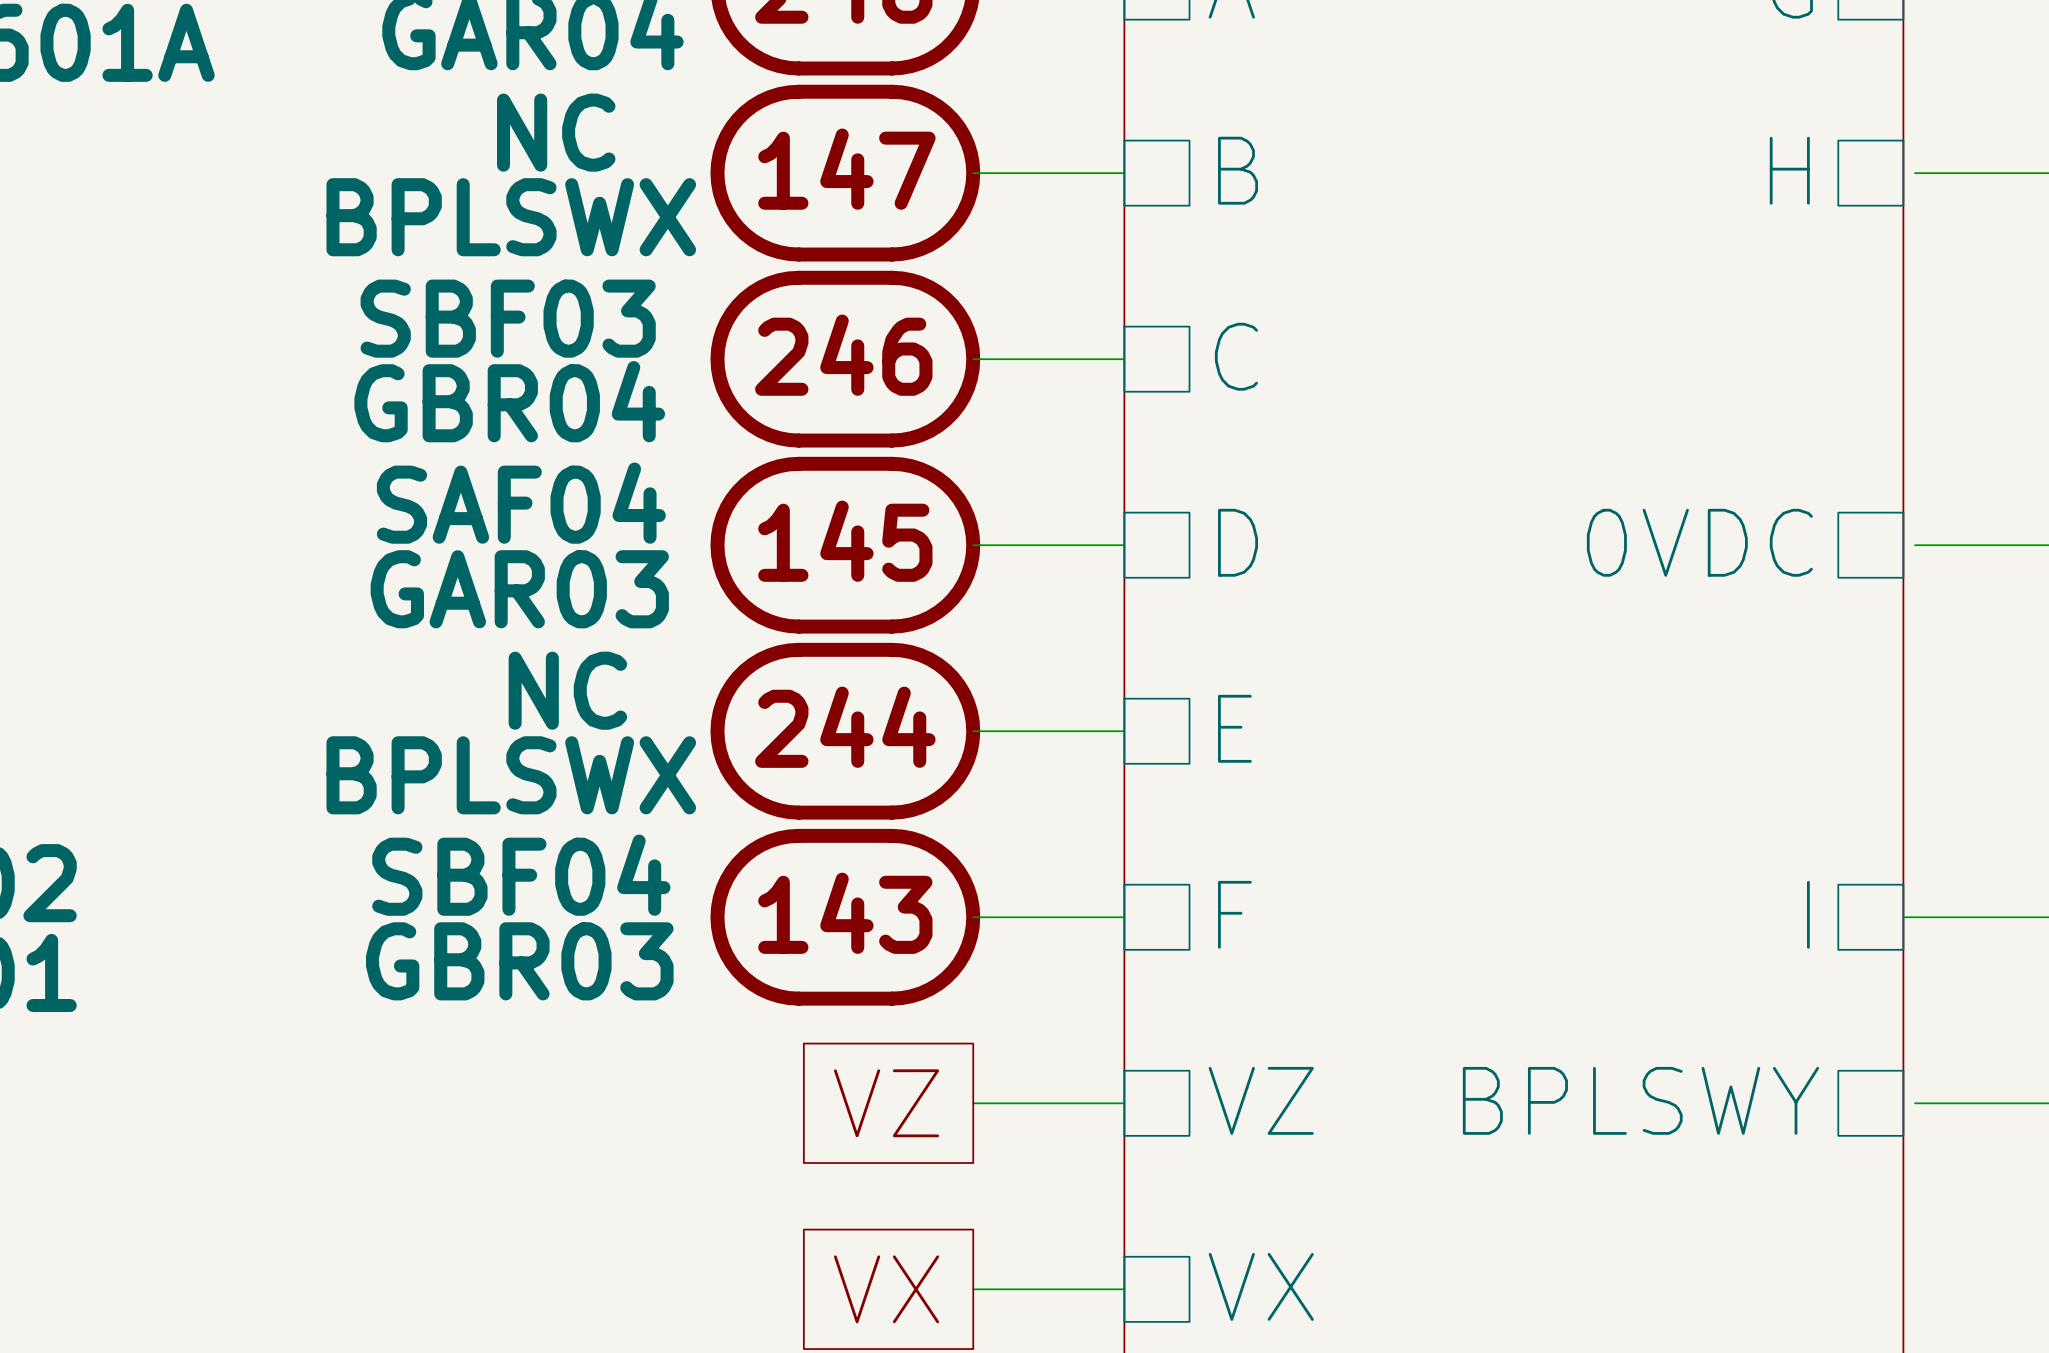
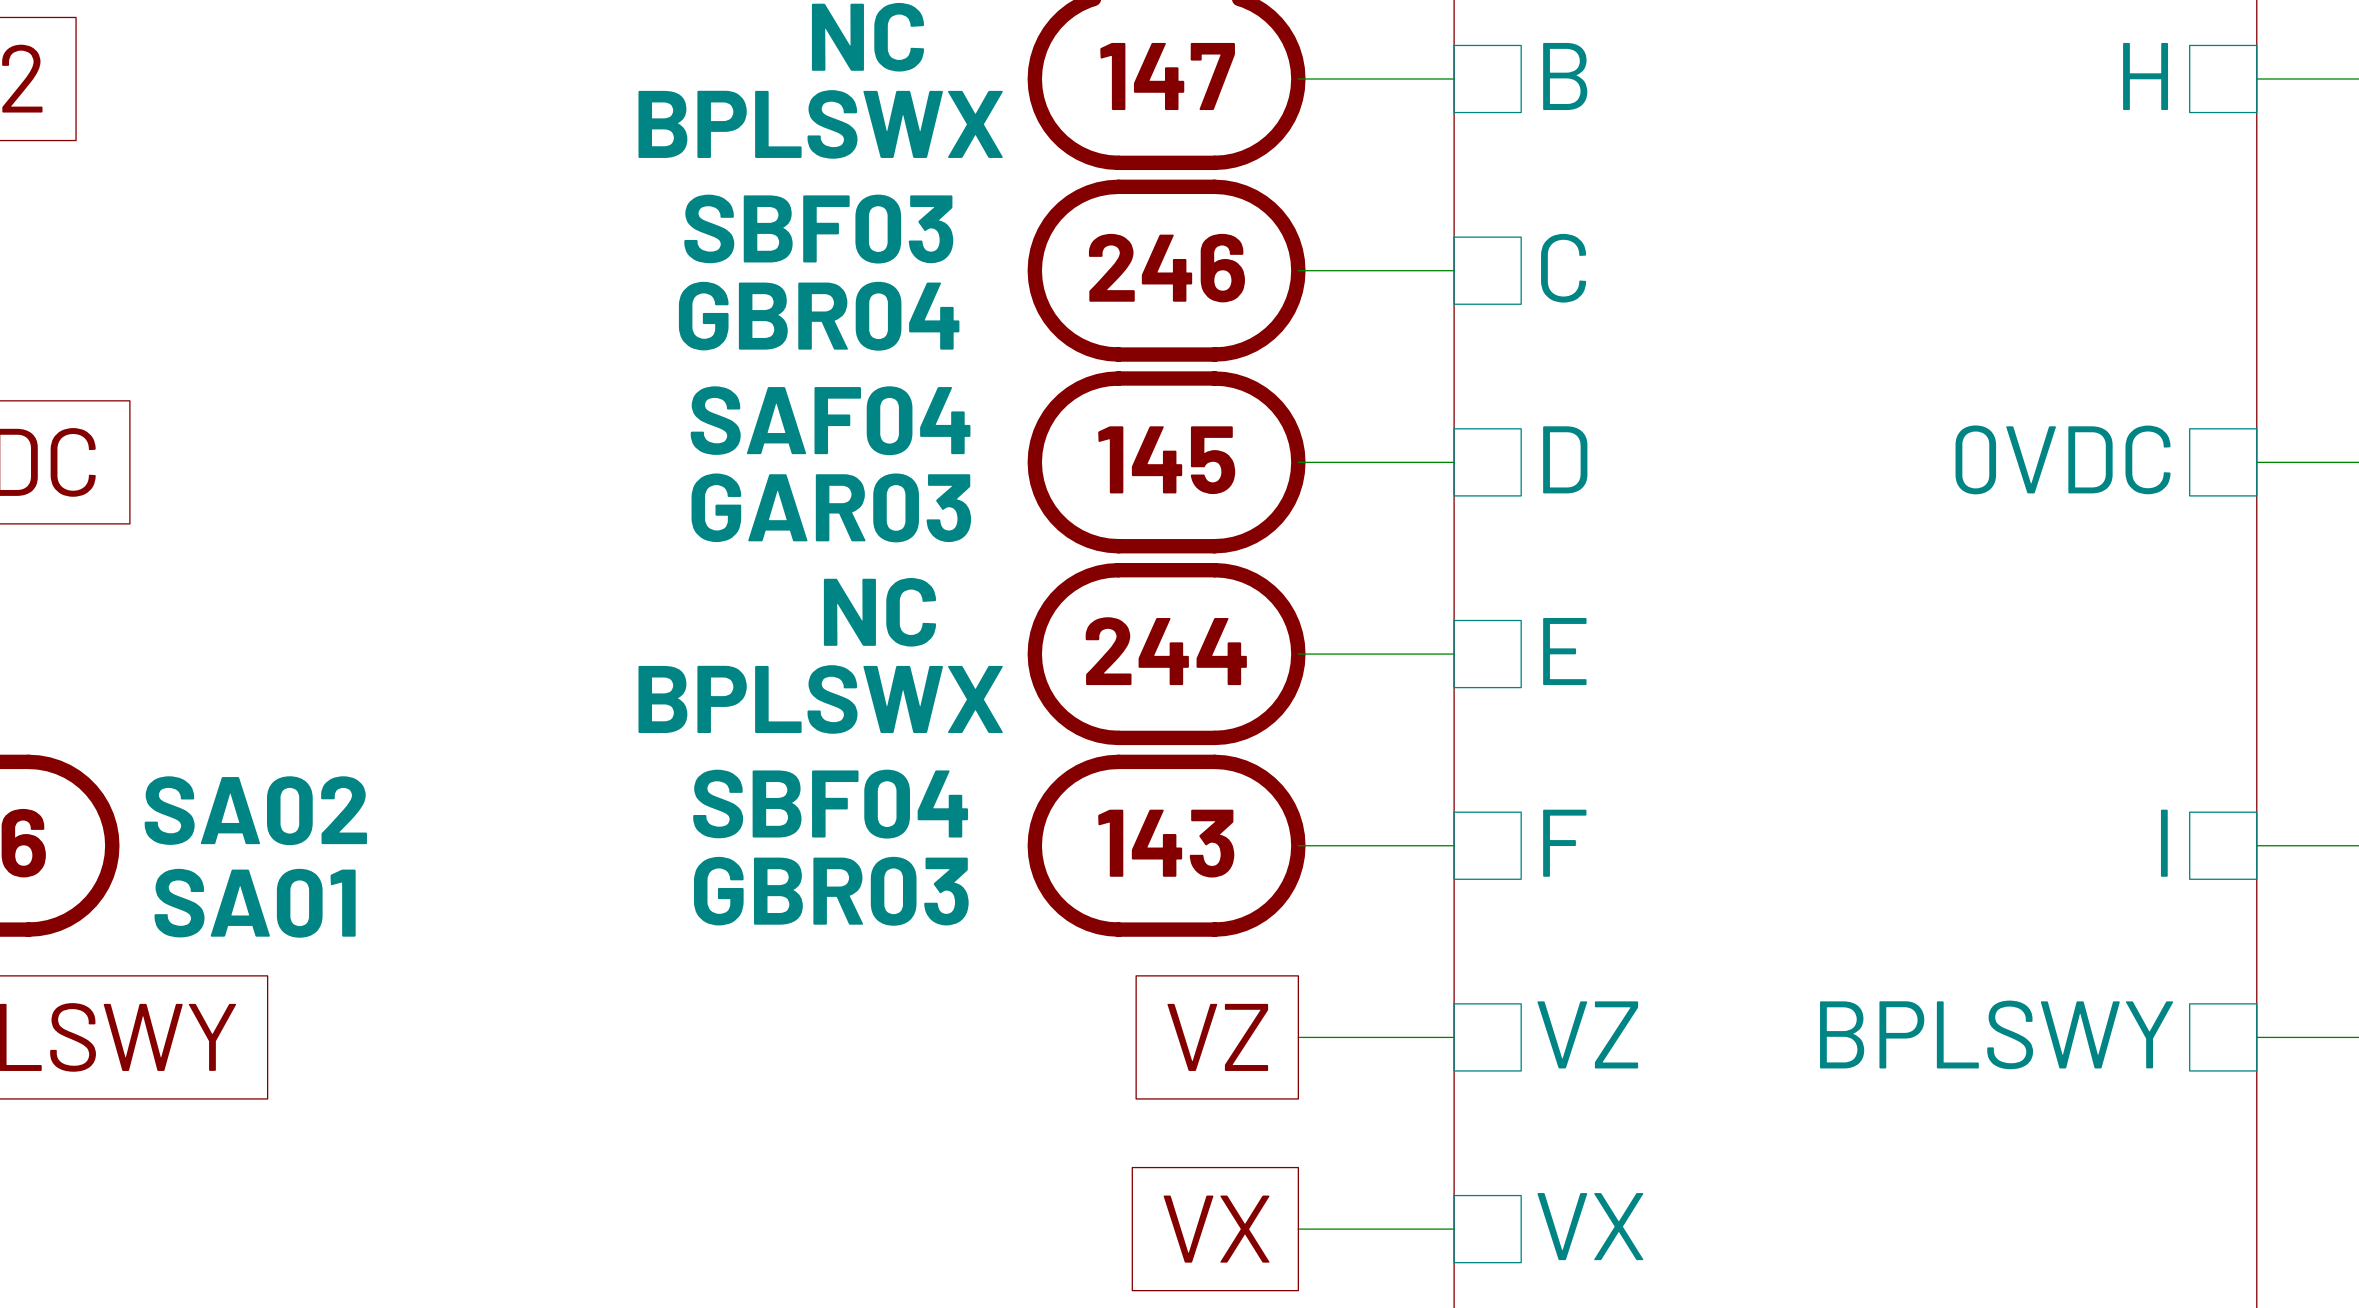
wire: none -> (2256, 79) (2268, 79)
wire: none -> (2256, 462) (2268, 462)
wire: none -> (2256, 1037) (2268, 1037)

